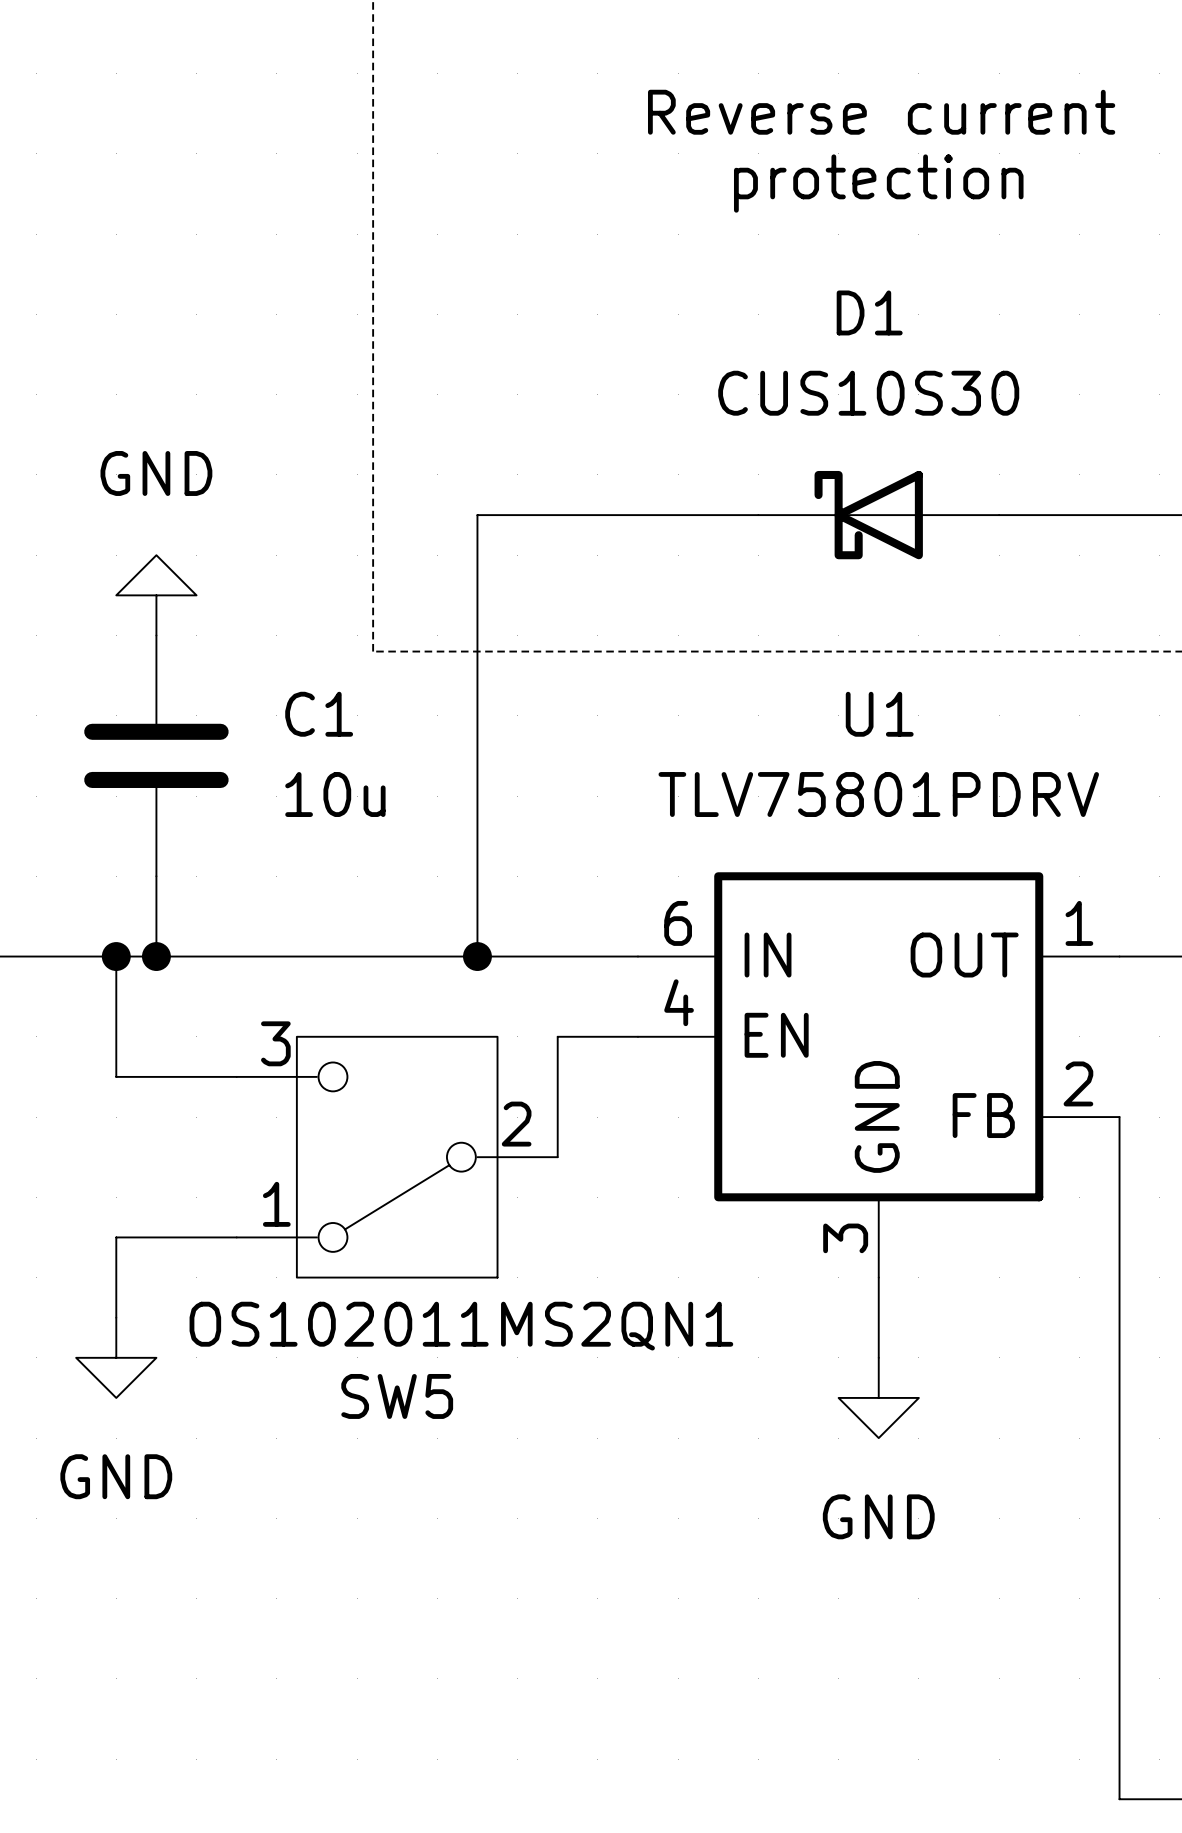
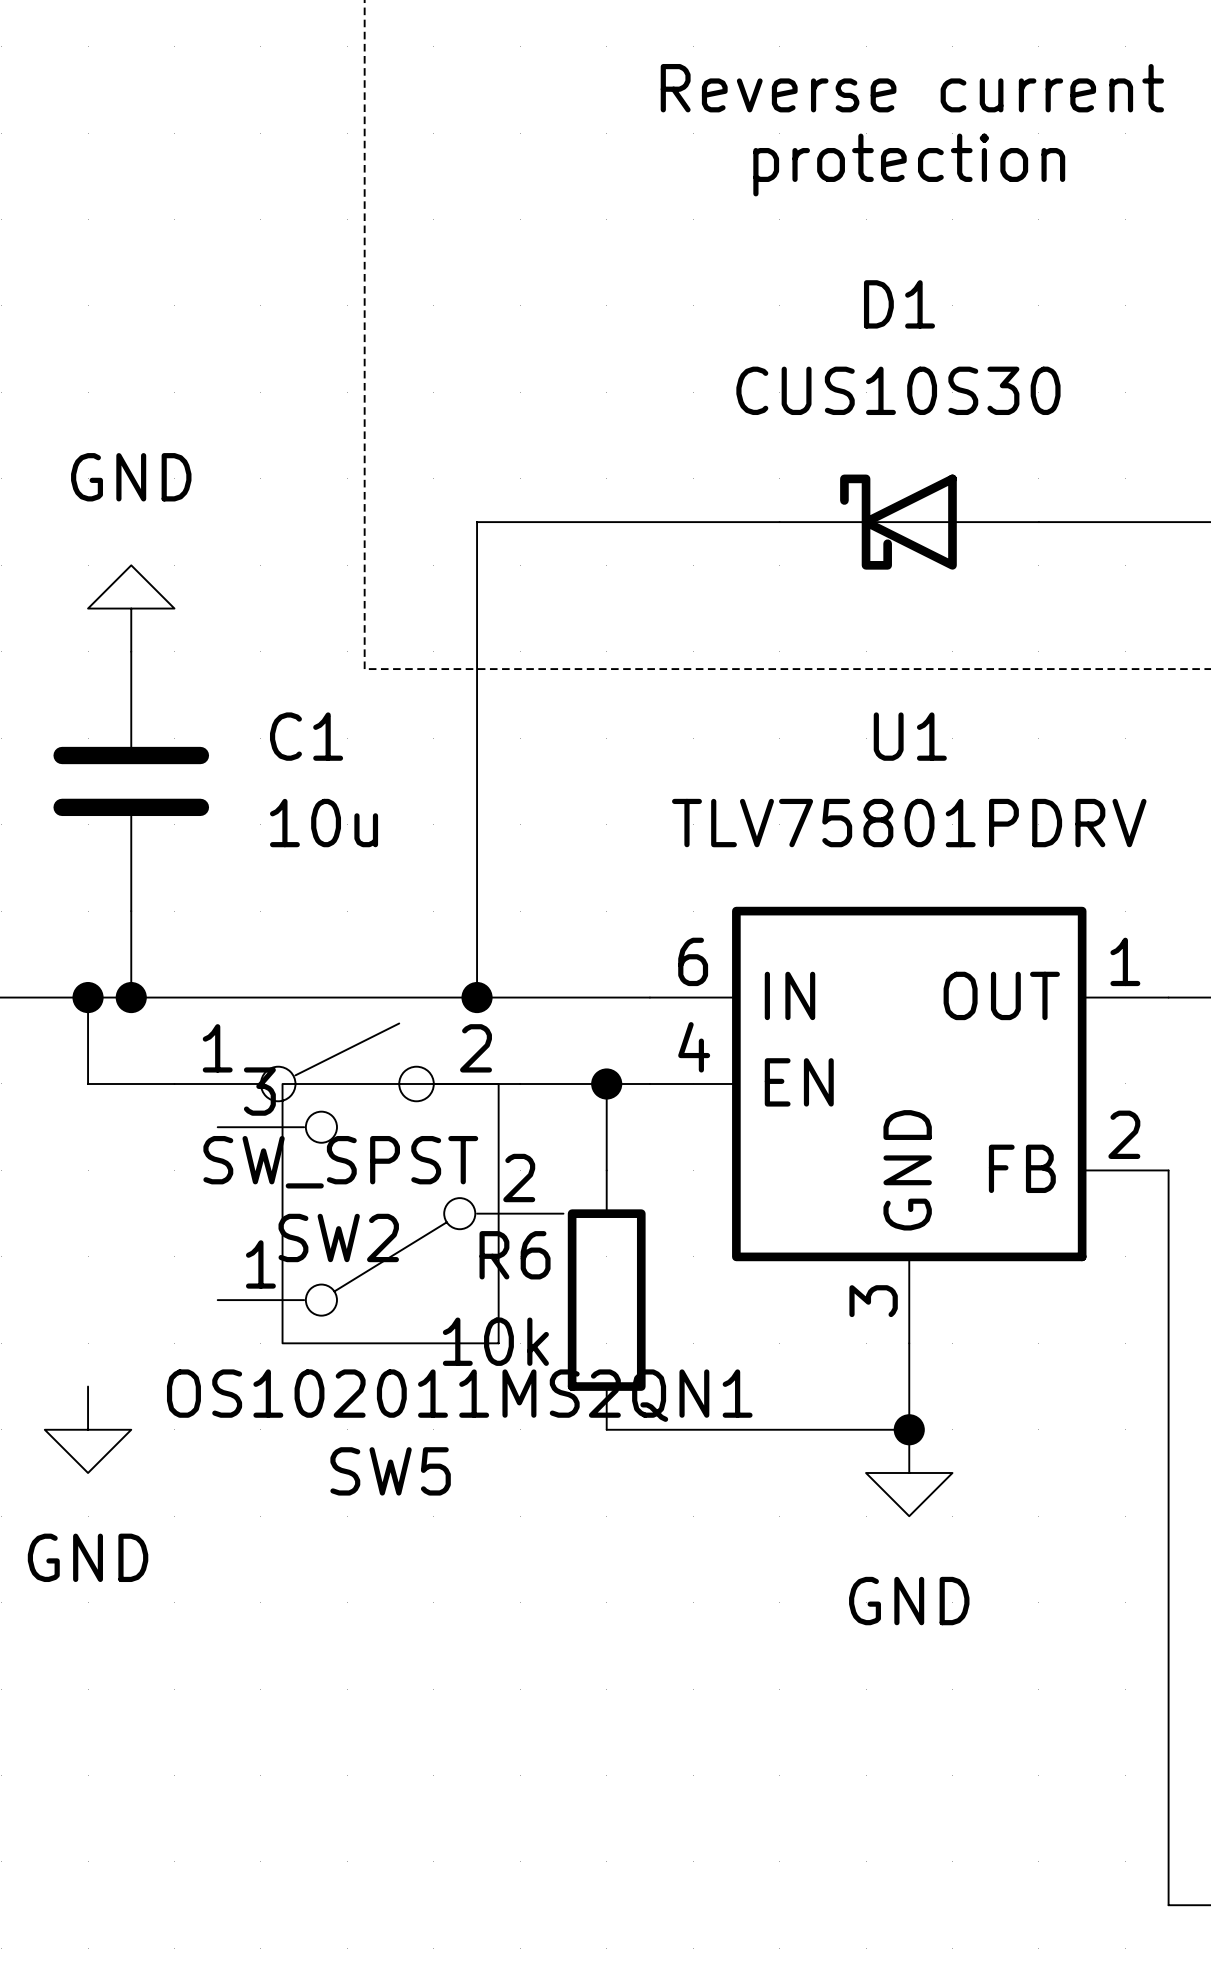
SW2: none -> SW_SPST (347, 1062)
wire: (116, 1036) (116, 1076) (236, 1076) -> (88, 1083) (174, 1083)
wire: (557, 1036) (557, 1157) -> (563, 1083) (520, 1083)
wire: none -> (606, 1083) (606, 1170)
junction: none -> (606, 1083)
wire: (236, 1237) (116, 1237) (116, 1317) -> none
R6: none -> 10k (606, 1300)
wire: none -> (606, 1429) (909, 1429)
junction: none -> (909, 1429)

